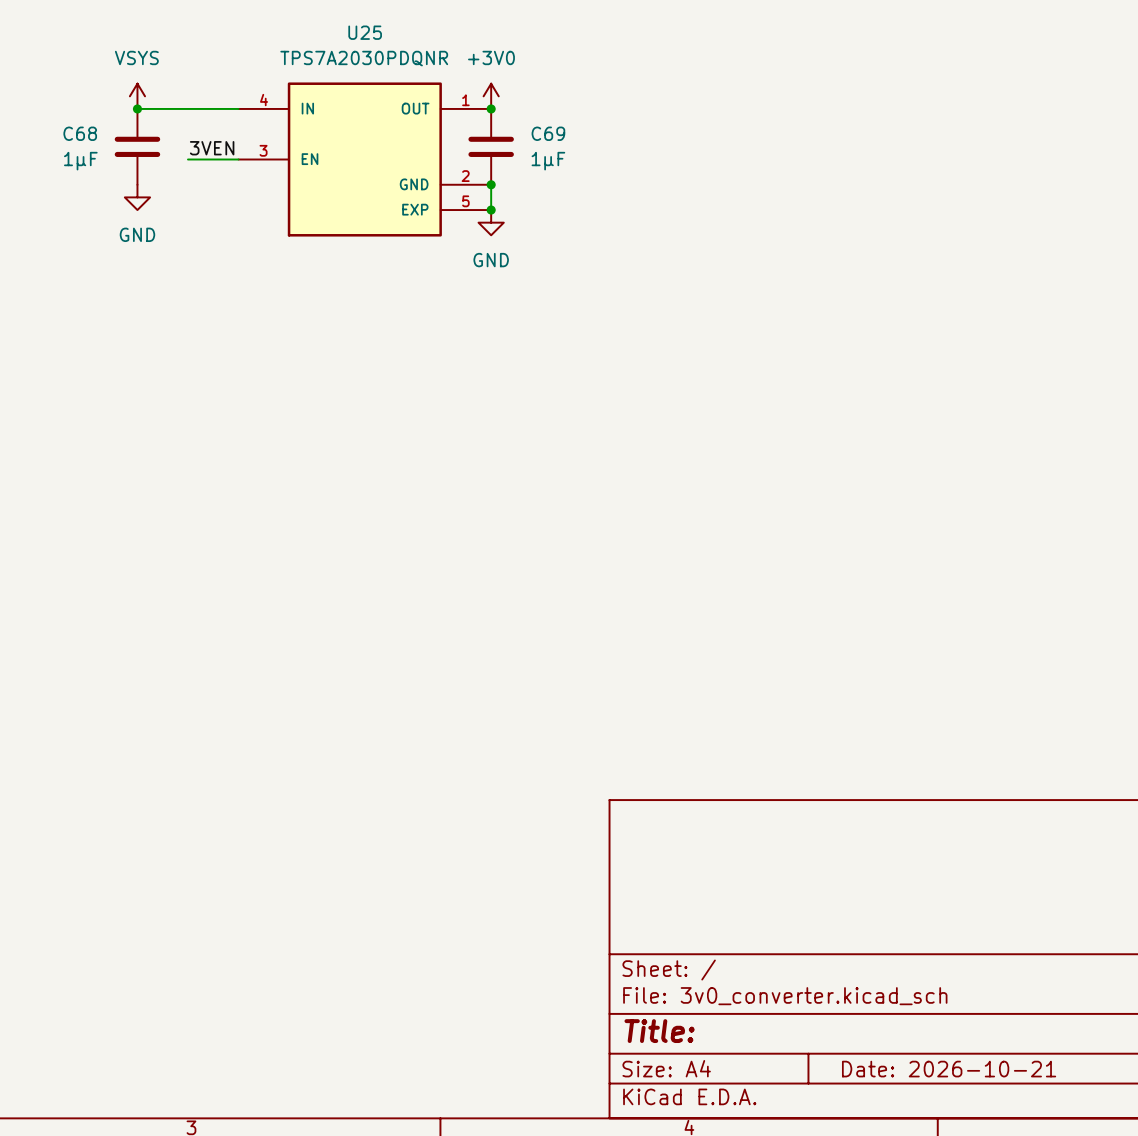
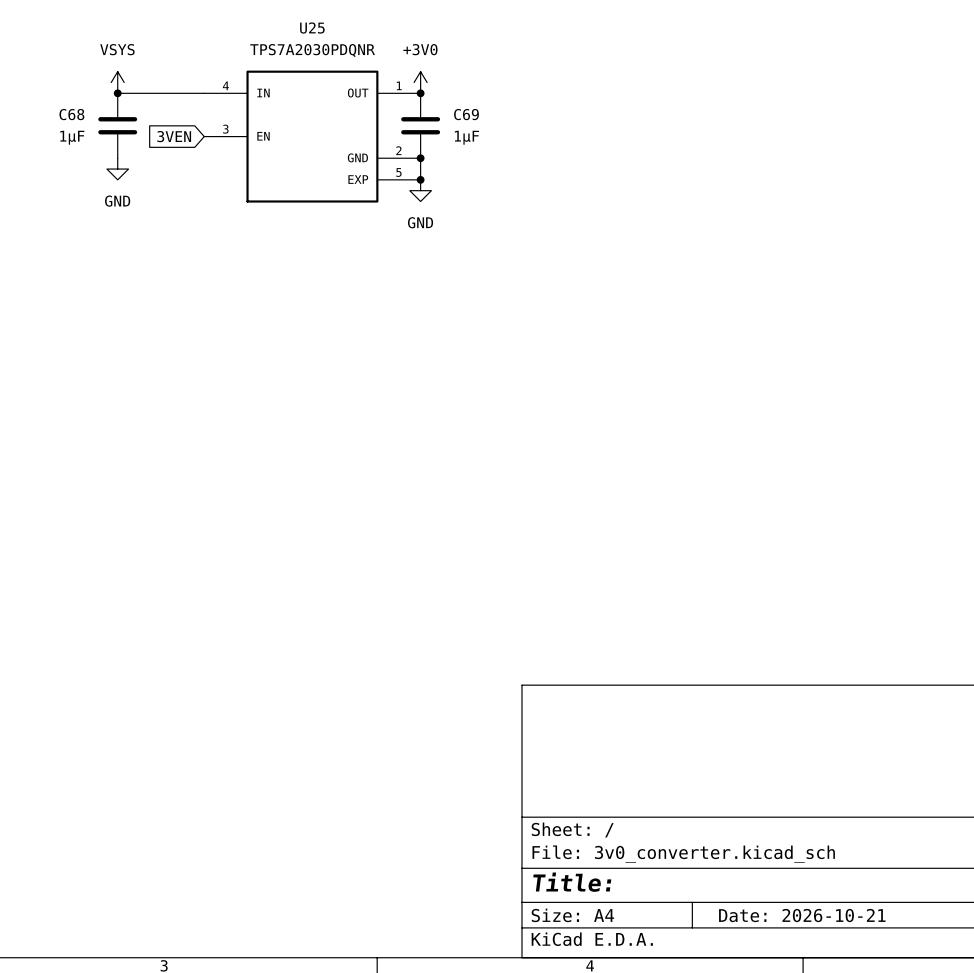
label: 3VEN (212, 148) -> none
wire: (187, 159) (238, 159) -> none
global label: none -> 3VEN (174, 136)

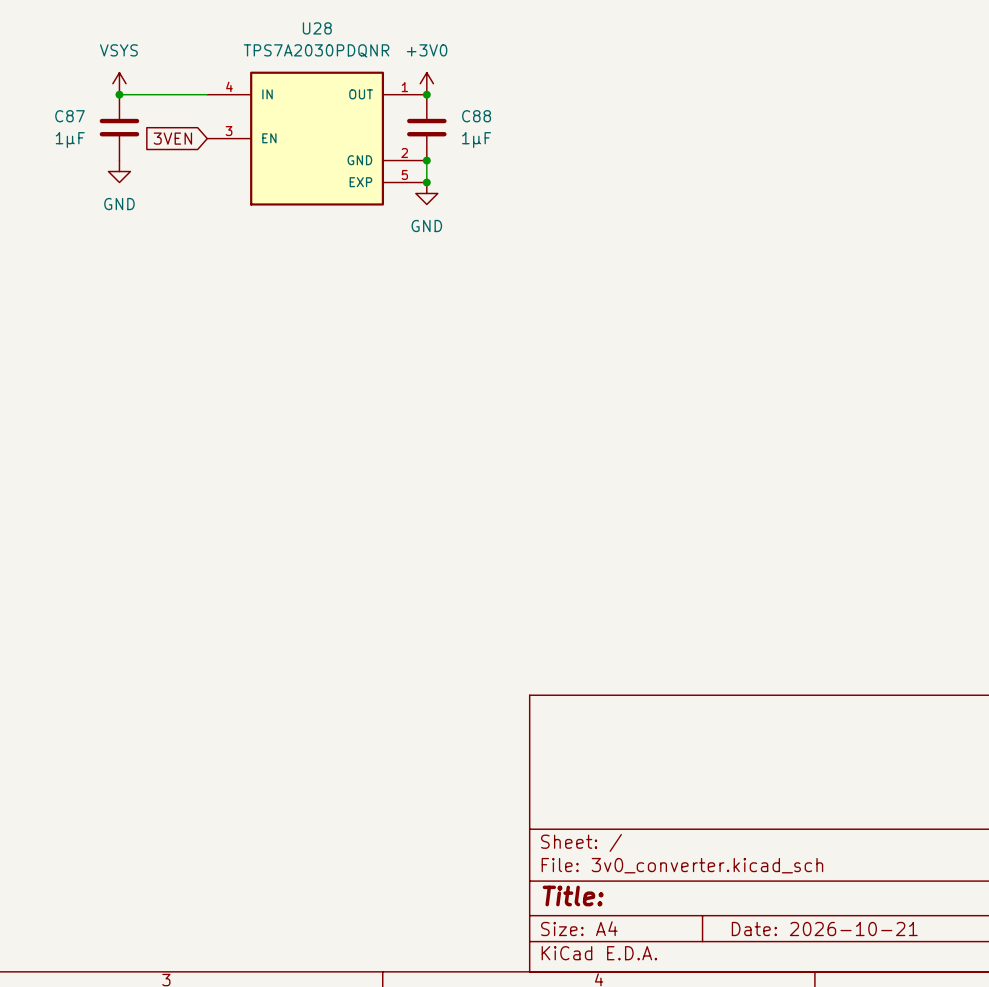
U25 name: U25 (312, 28) -> U28 (317, 28)
C68 name: C68 (71, 114) -> C87 (69, 116)
C69 name: C69 (466, 114) -> C88 (476, 116)

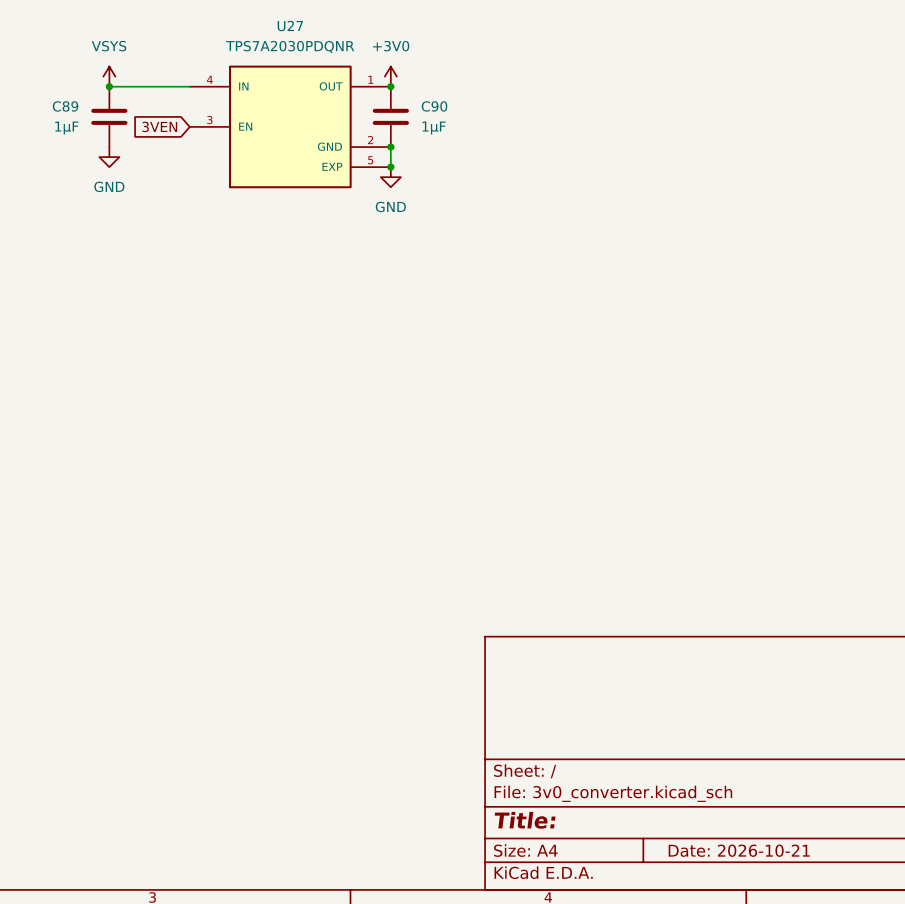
U28 name: U28 (317, 28) -> U27 (290, 26)
C87 name: C87 (69, 116) -> C89 (65, 106)
C88 name: C88 (476, 116) -> C90 (434, 106)

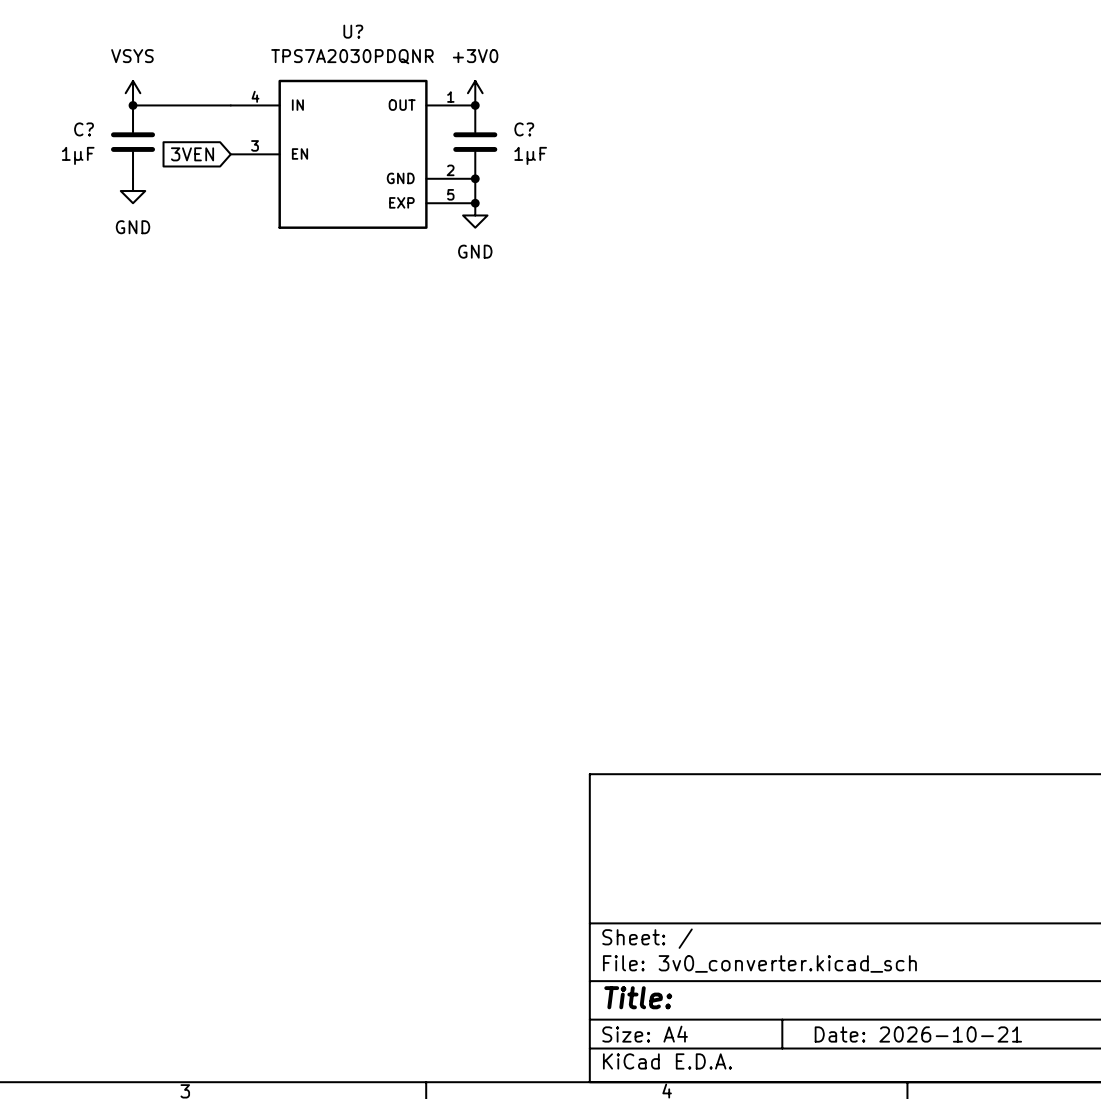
U27 name: U27 (290, 26) -> U? (353, 31)
C89 name: C89 (65, 106) -> C? (84, 129)
C90 name: C90 (434, 106) -> C? (524, 129)

